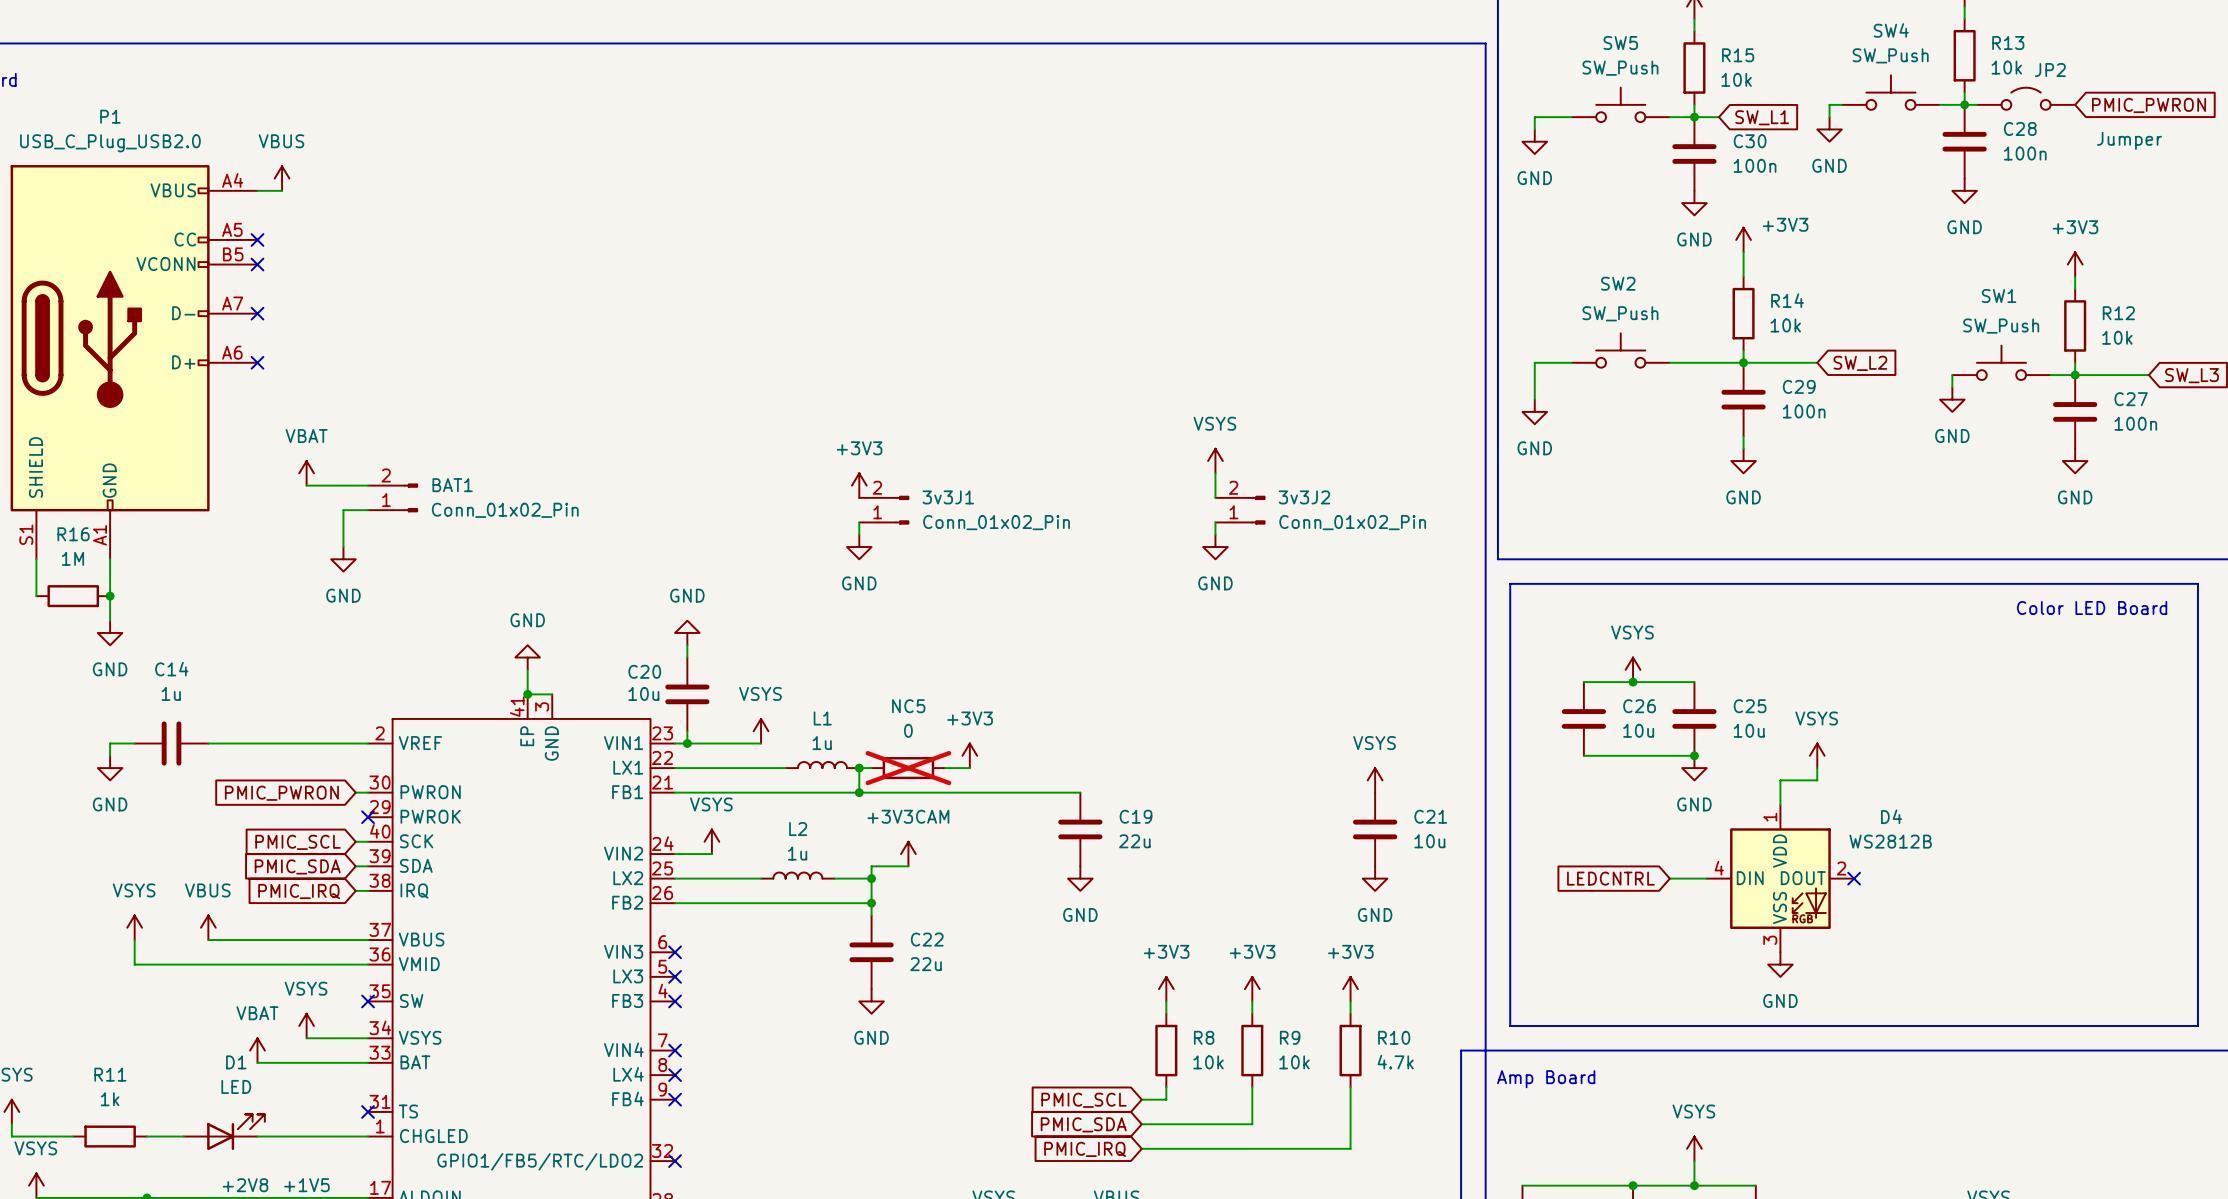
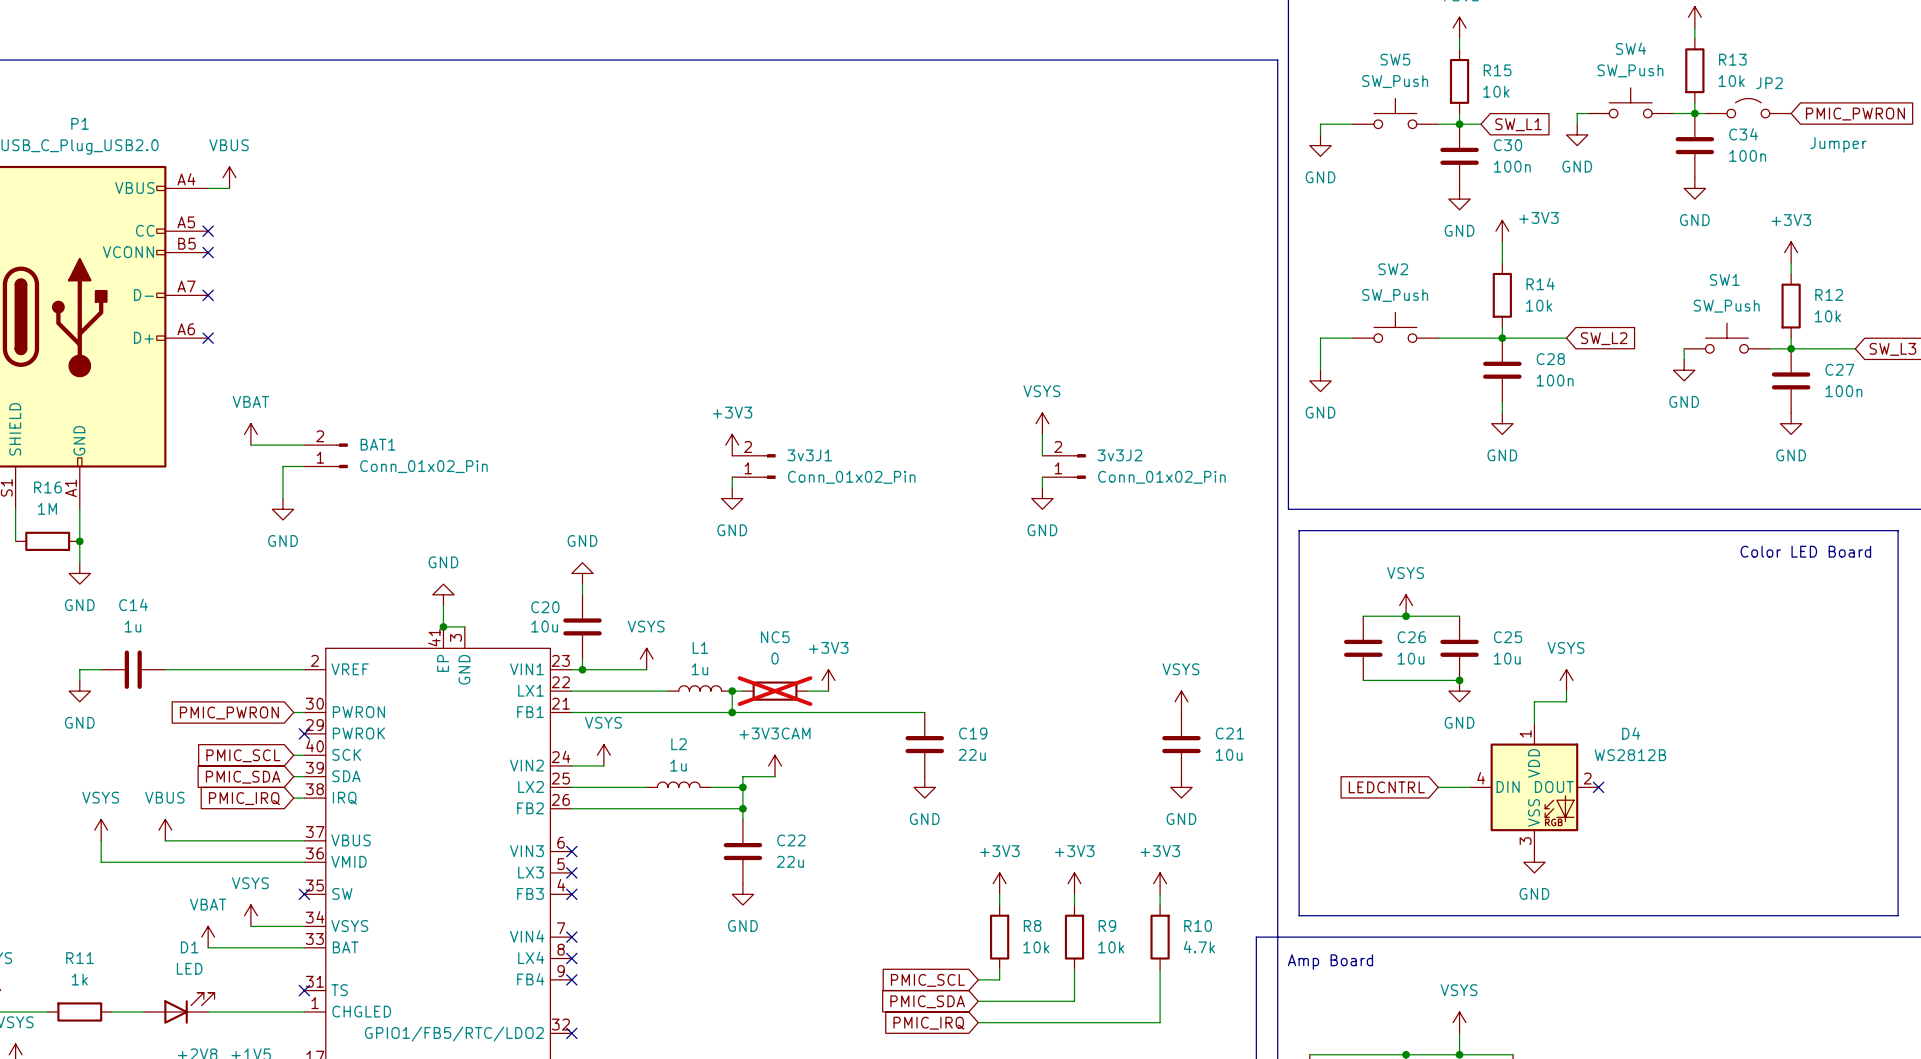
C28 name: C28 (2020, 128) -> C34 (1743, 134)
C29 name: C29 (1799, 386) -> C28 (1550, 359)

